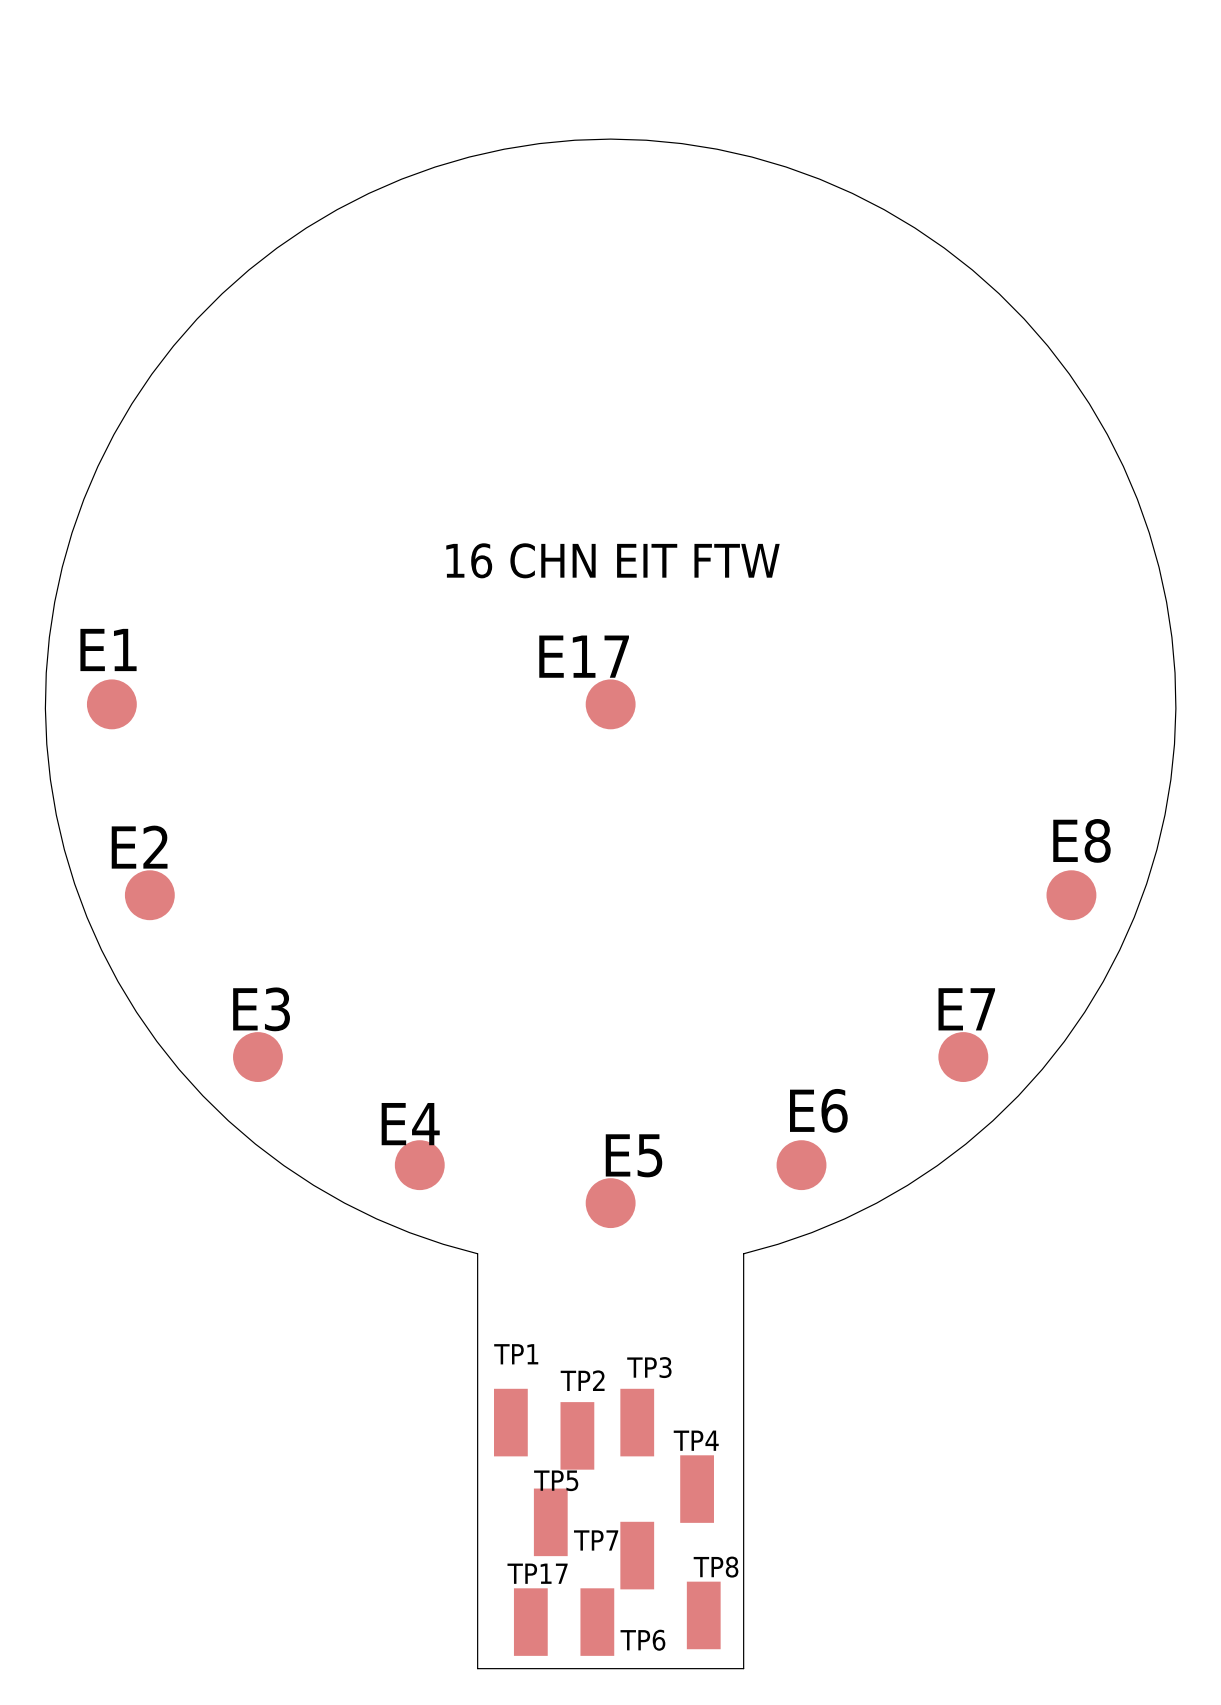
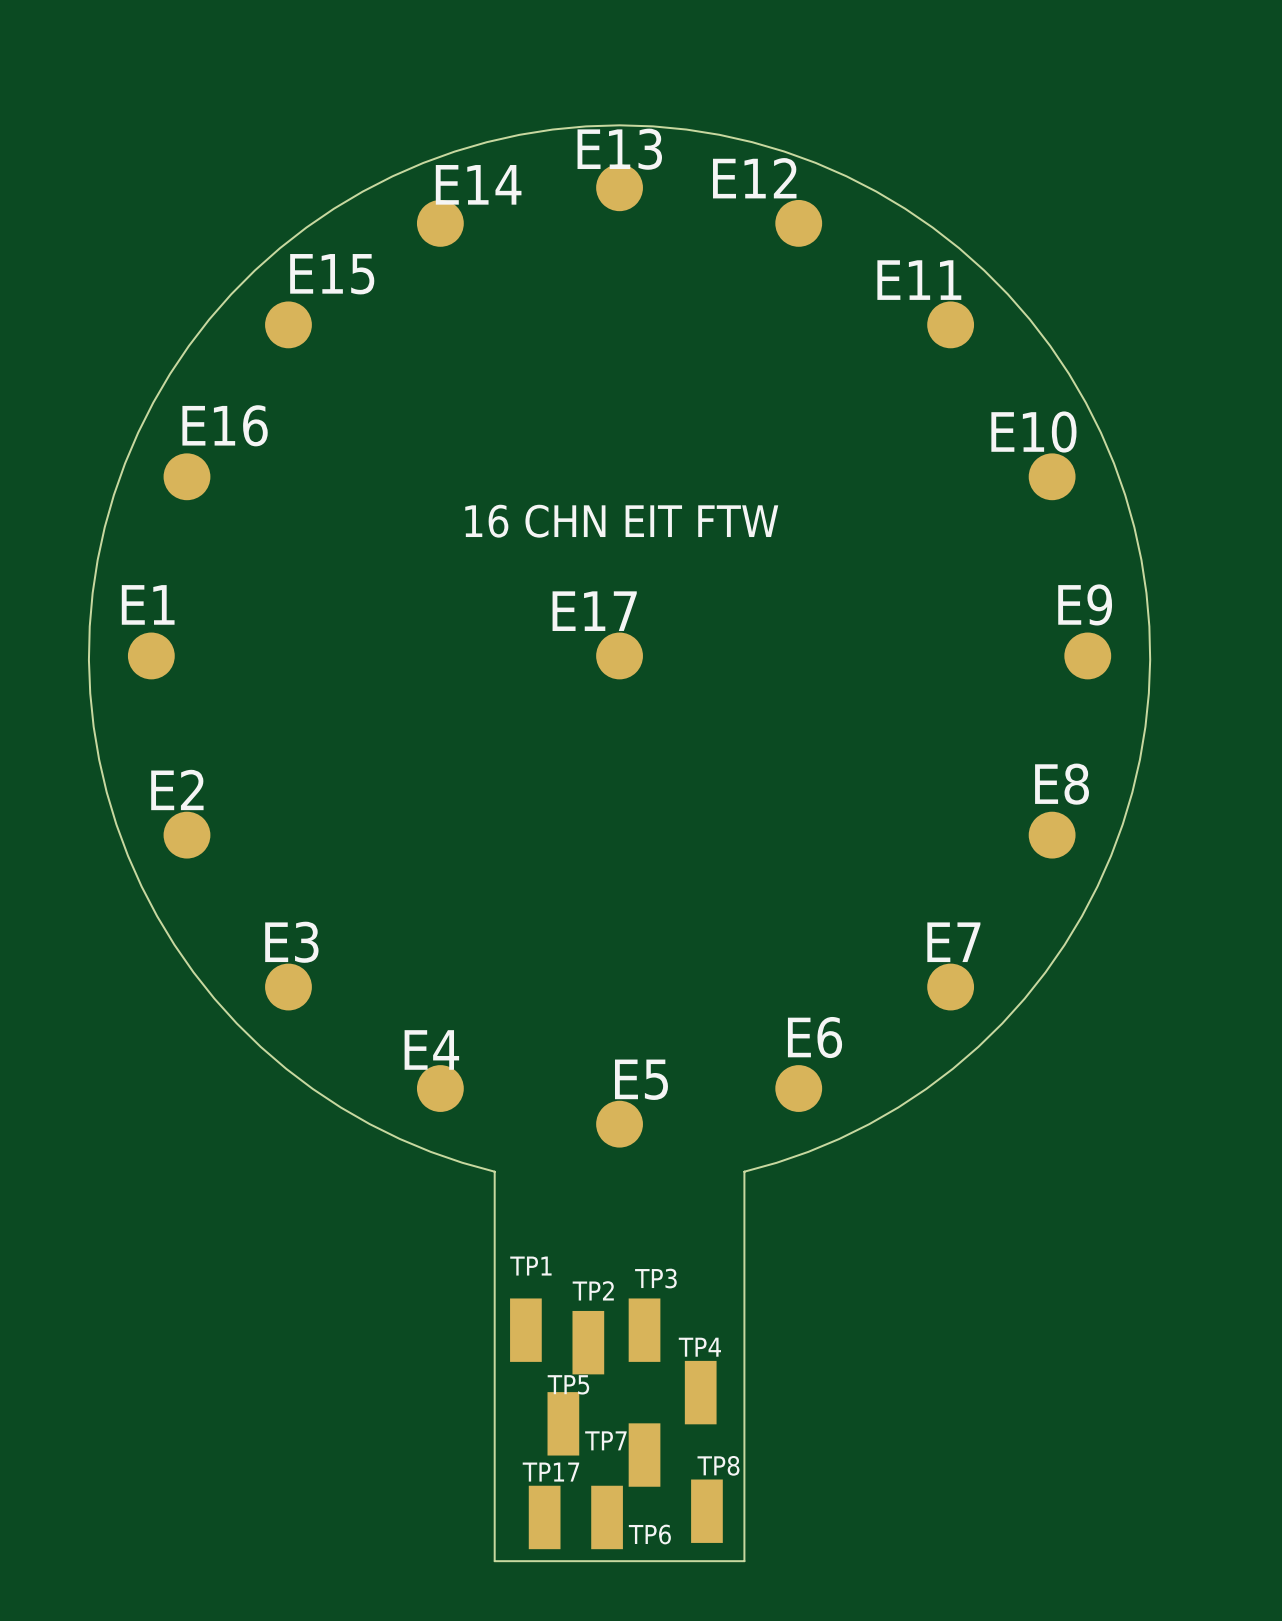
E13: none -> (619, 187)
E14: none -> (440, 223)
E12: none -> (798, 223)
E15: none -> (288, 324)
E11: none -> (950, 324)
E16: none -> (186, 476)
E10: none -> (1052, 476)
E9: none -> (1087, 655)

